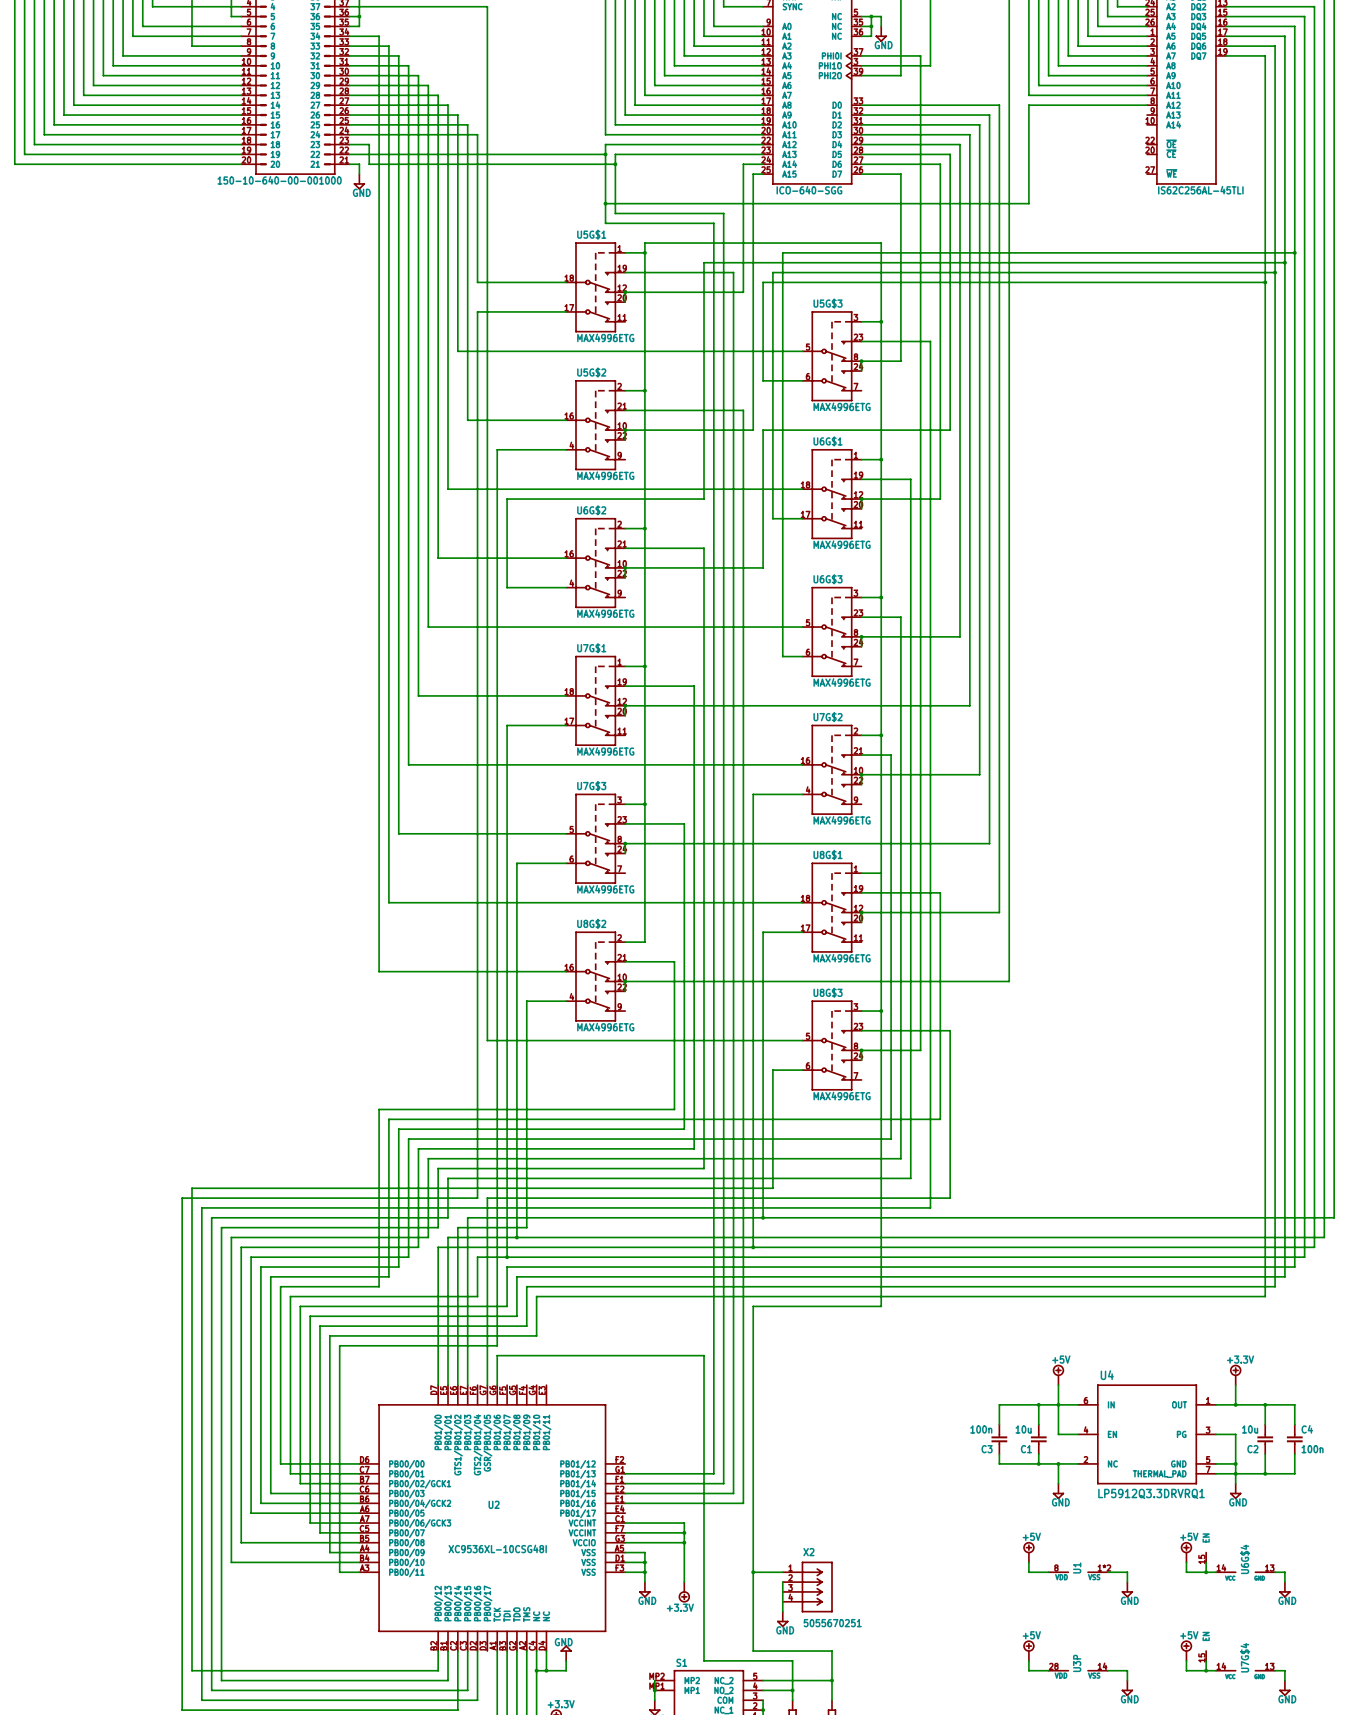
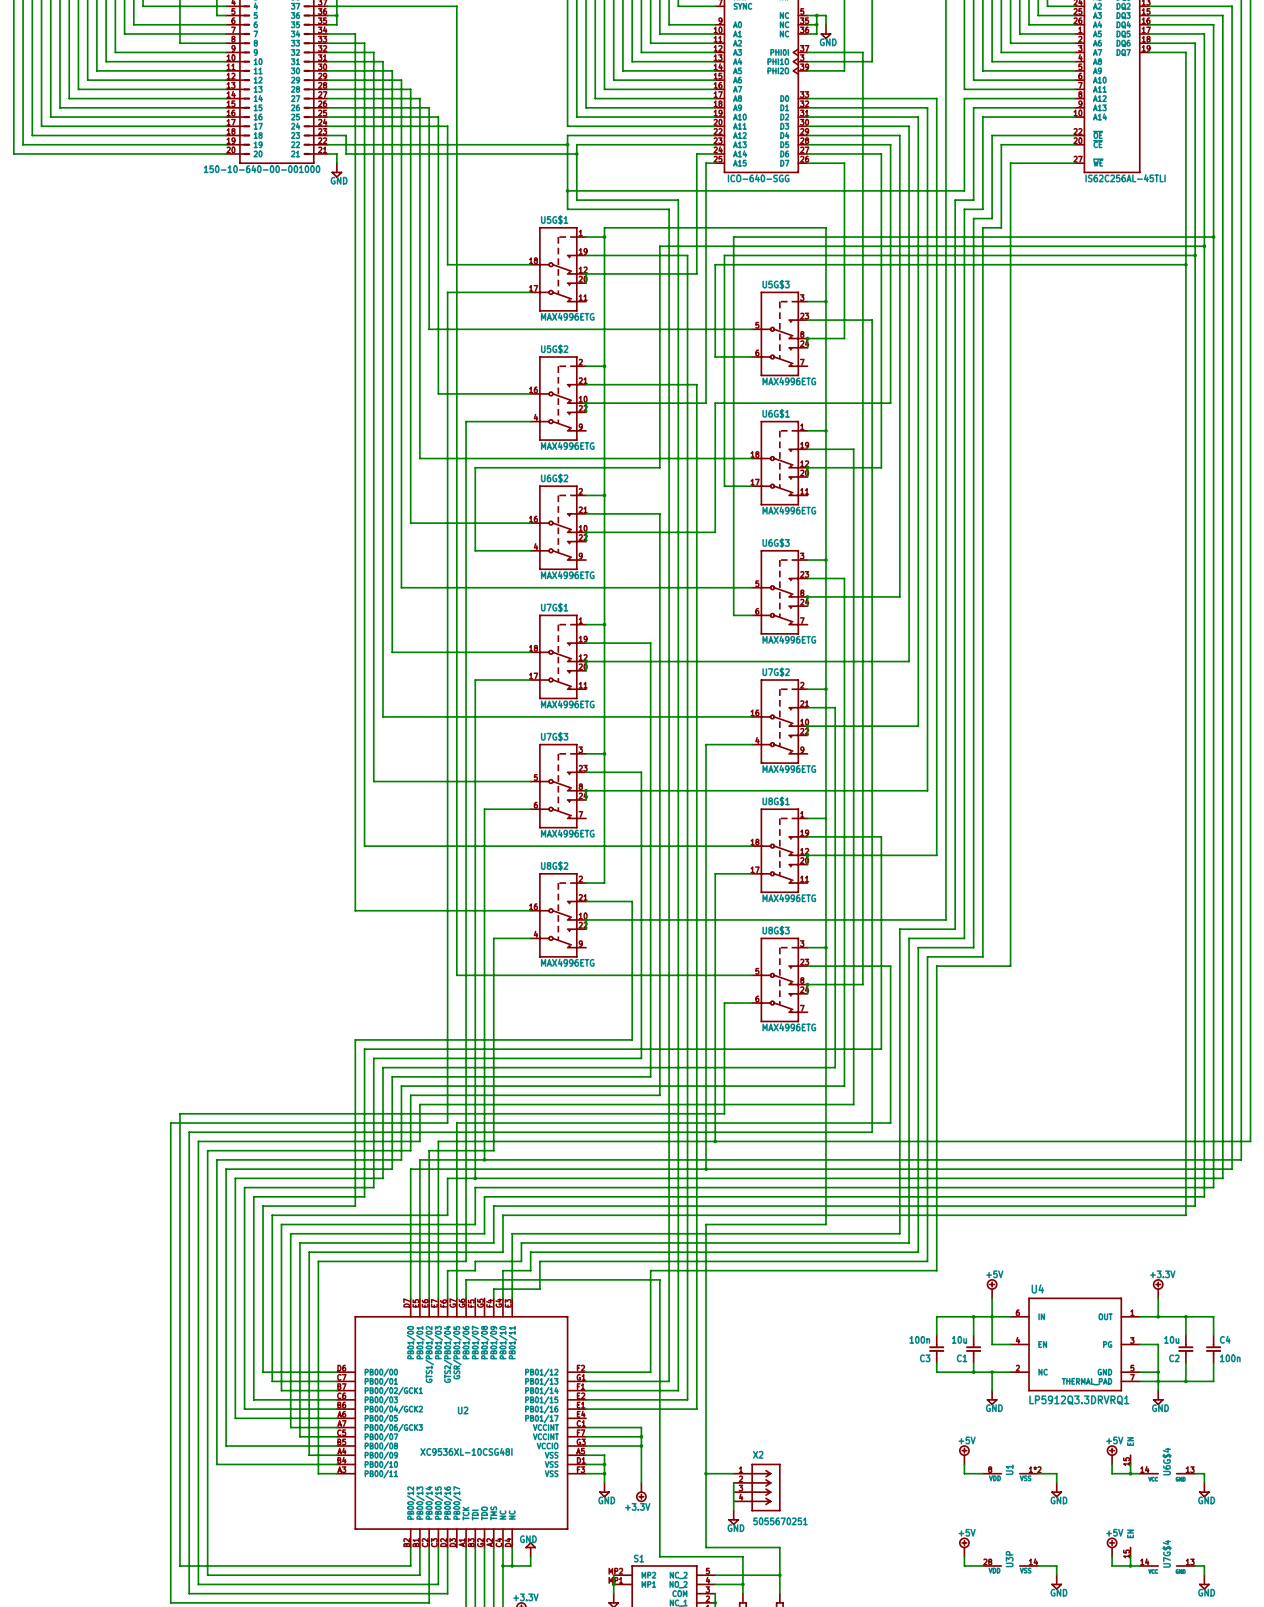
wire: none -> (1075, 107) (973, 107) (973, 200) (955, 200) (955, 929) (899, 929) (899, 1233) (512, 1233) (512, 1298)
wire: none -> (1075, 117) (982, 117) (982, 209) (964, 209) (964, 938) (909, 938) (909, 1242) (521, 1242) (521, 1261) (475, 1261) (475, 1270)
wire: none -> (1075, 135) (992, 135) (992, 218) (973, 218) (973, 947) (918, 947) (918, 1252) (530, 1252) (530, 1270)
wire: none -> (1075, 144) (1001, 144) (1001, 227) (982, 227) (982, 956) (927, 956) (927, 1261) (539, 1261) (539, 1289) (493, 1289) (493, 1298)
wire: none -> (1075, 163) (1010, 163) (1010, 966) (936, 966) (936, 1270) (659, 1270)
wire: (497, 1355) (497, 1365) -> (466, 1270) (447, 1270) (447, 1298)
wire: (507, 1355) (536, 1355) -> (502, 1298) (502, 1270)
wire: (566, 1355) (694, 1355) -> (586, 1372) (650, 1372) (650, 1270)
wire: (704, 1355) (704, 1365) -> (466, 1279) (659, 1279)

